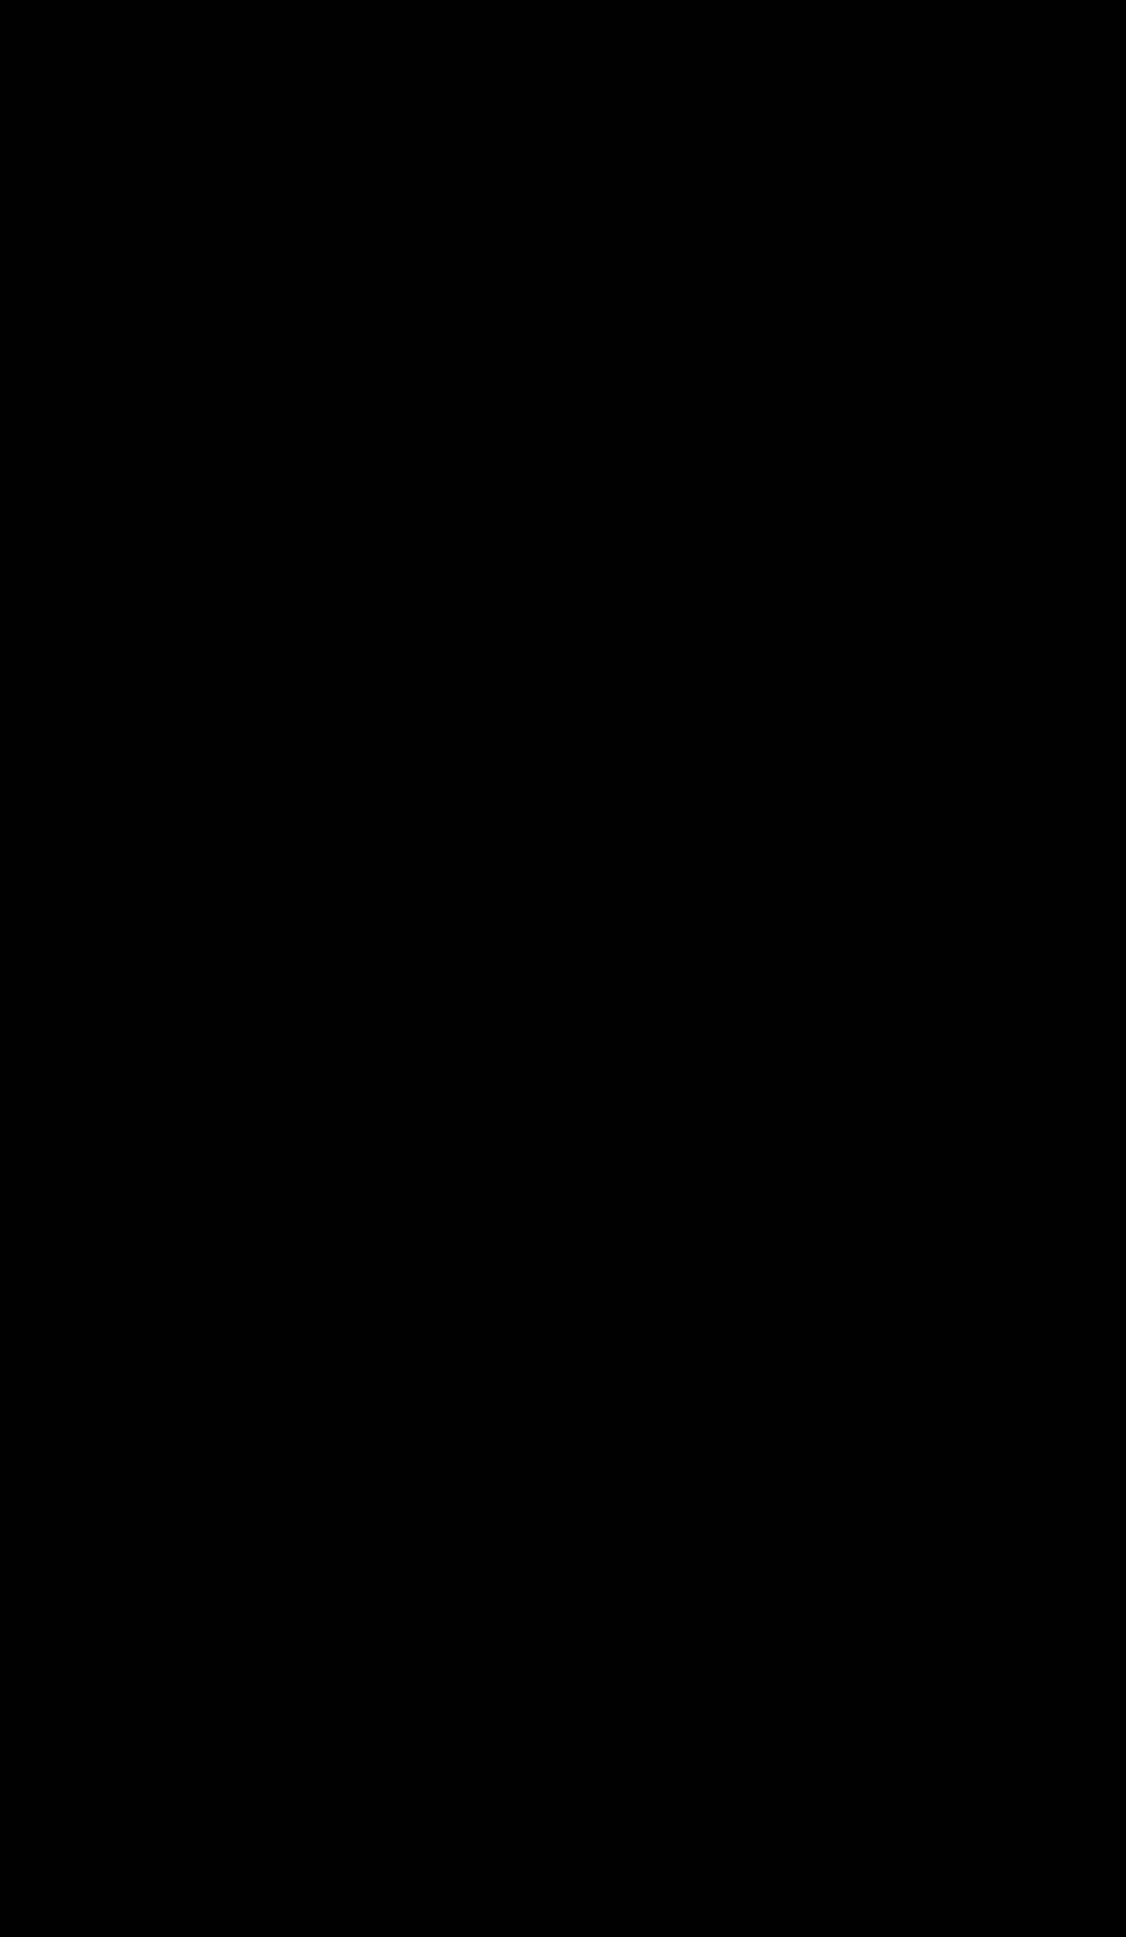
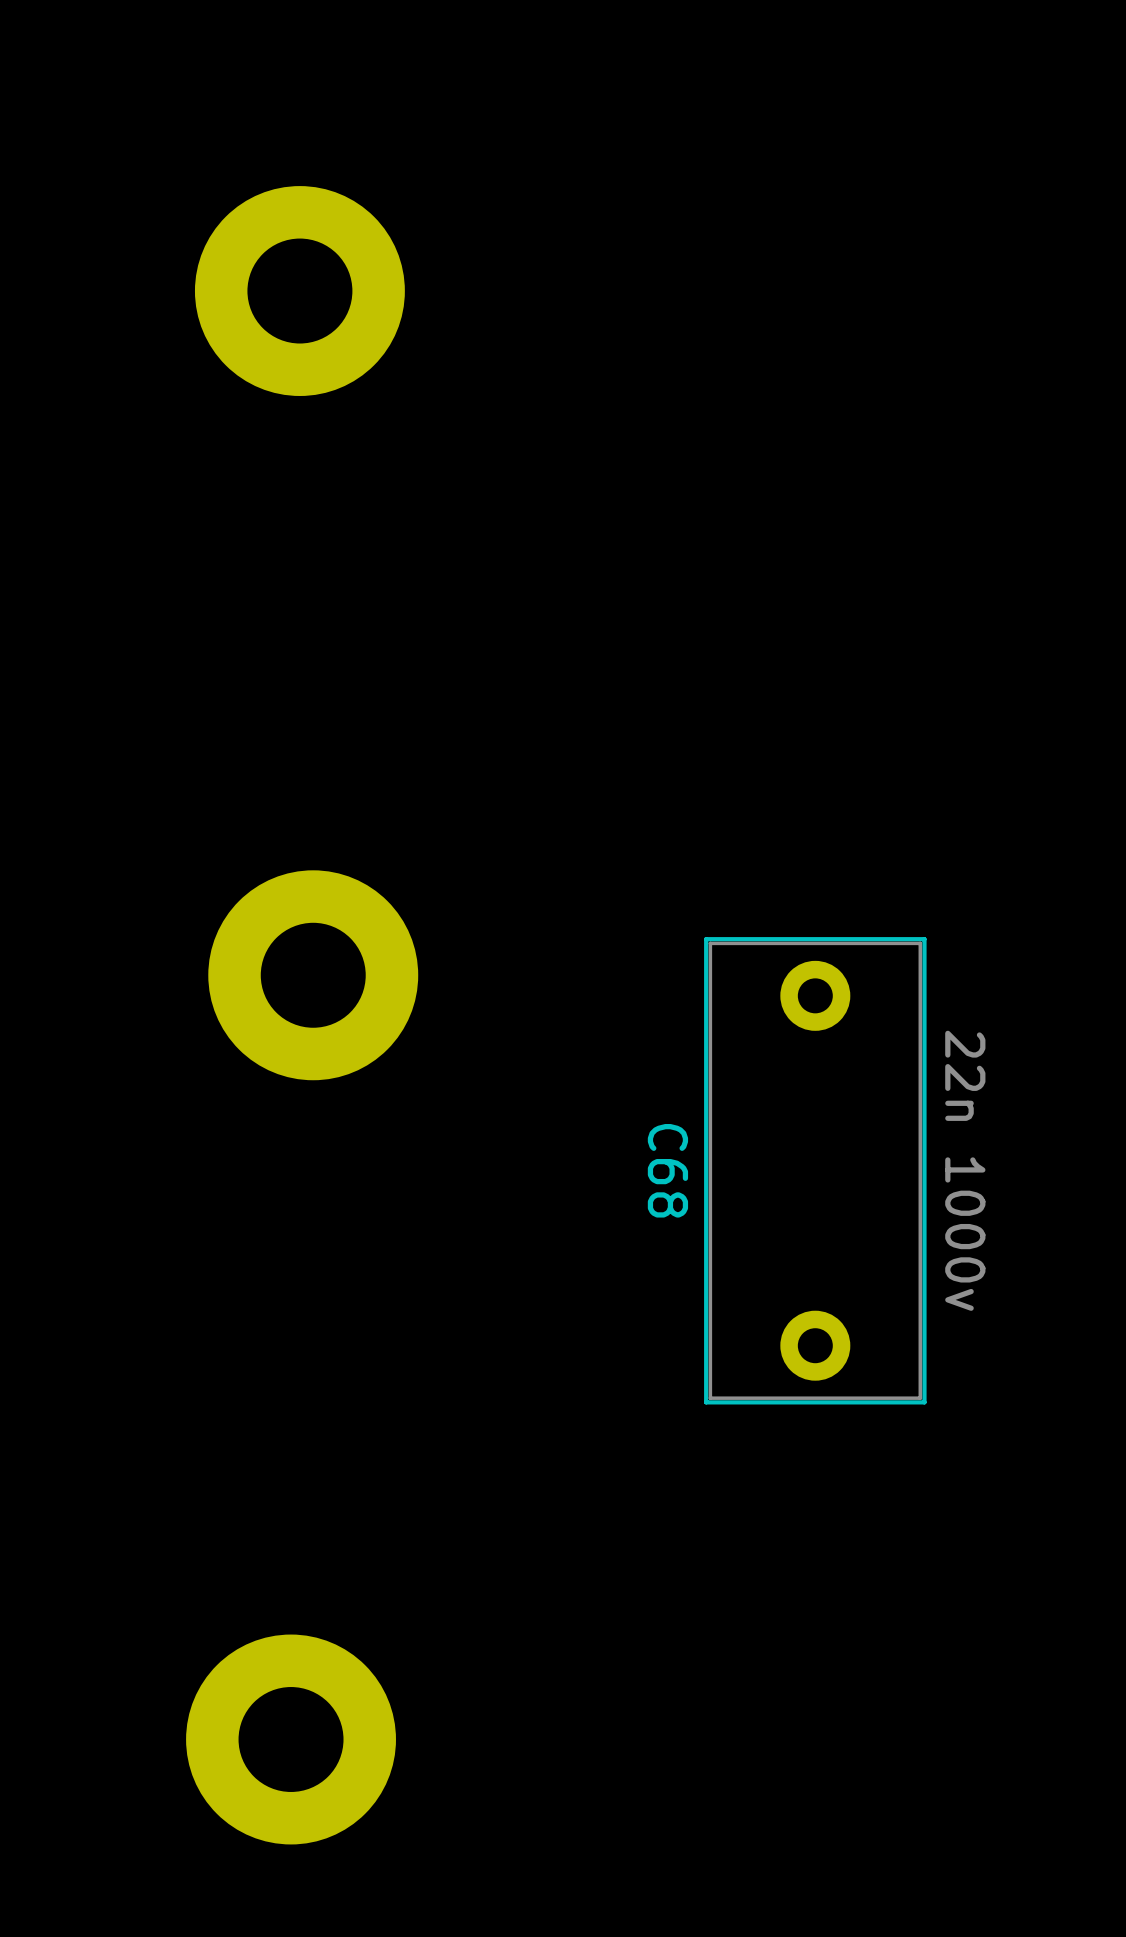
part: none -> (299, 291)
part: none -> (313, 975)
C68: none -> 22n 1000v (815, 1170)
part: none -> (291, 1739)

